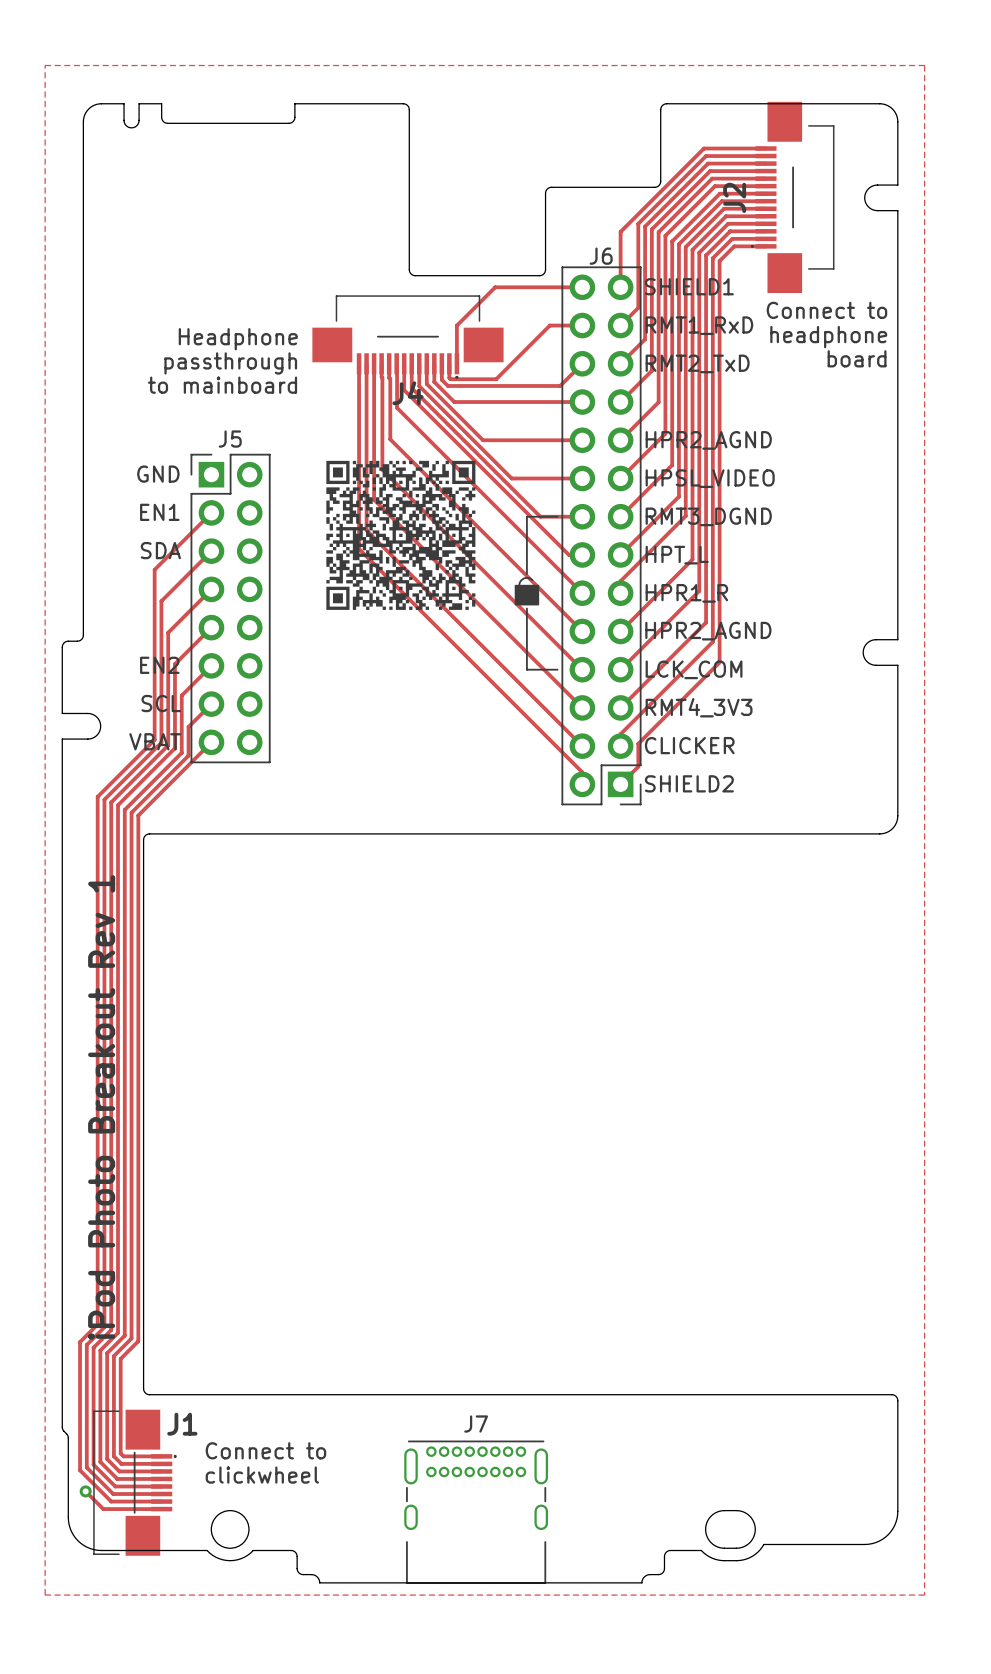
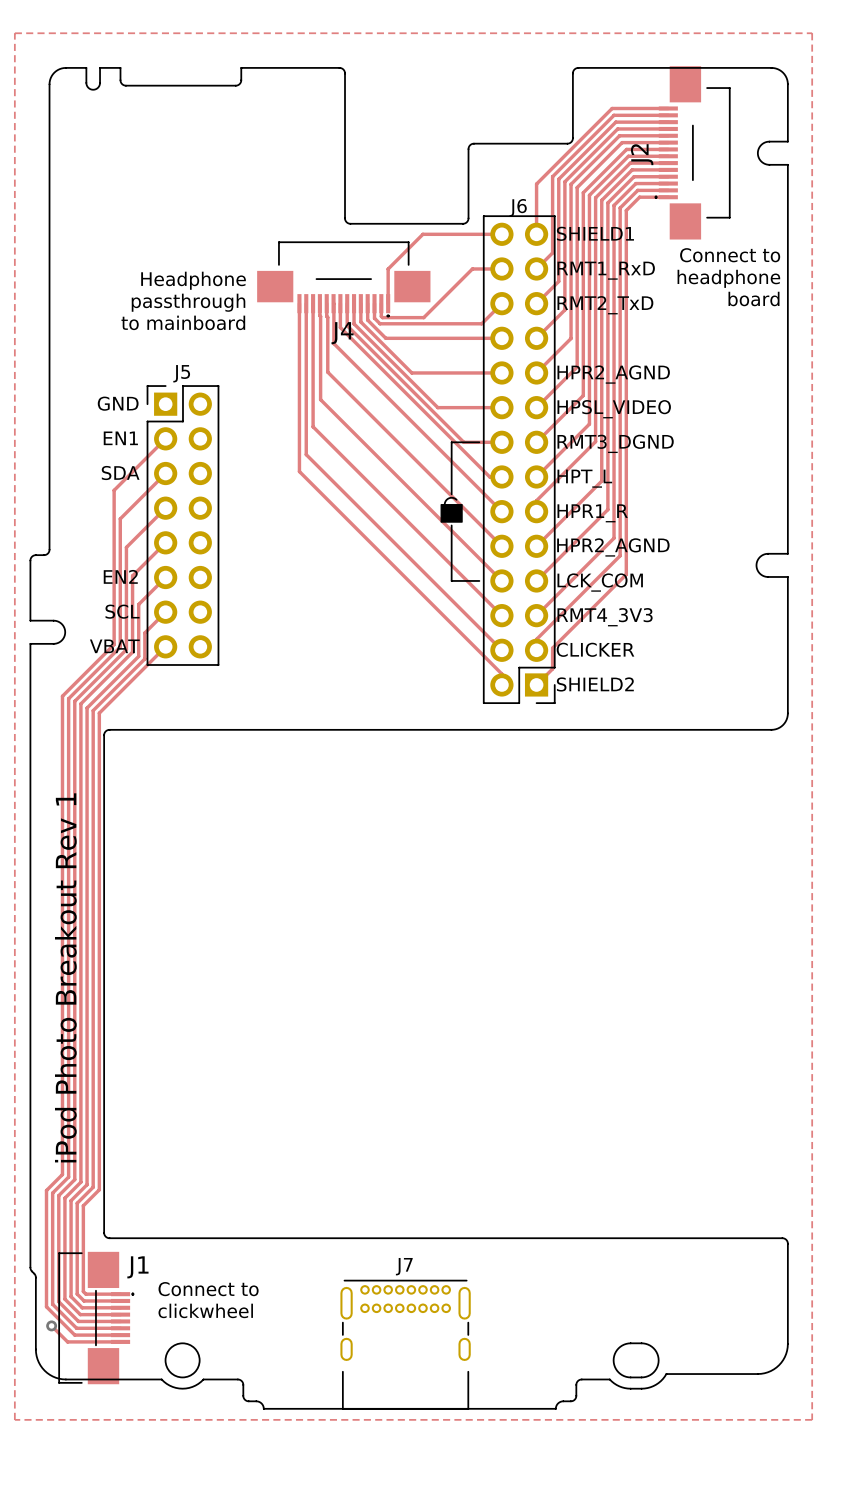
drawing: [326, 460, 476, 610] -> none

